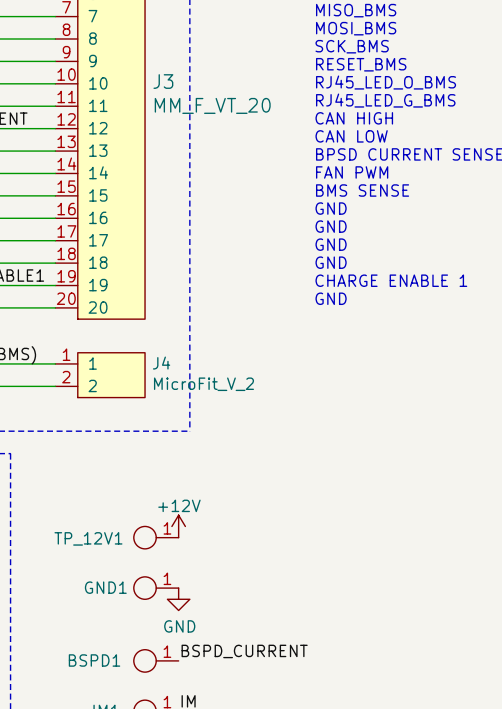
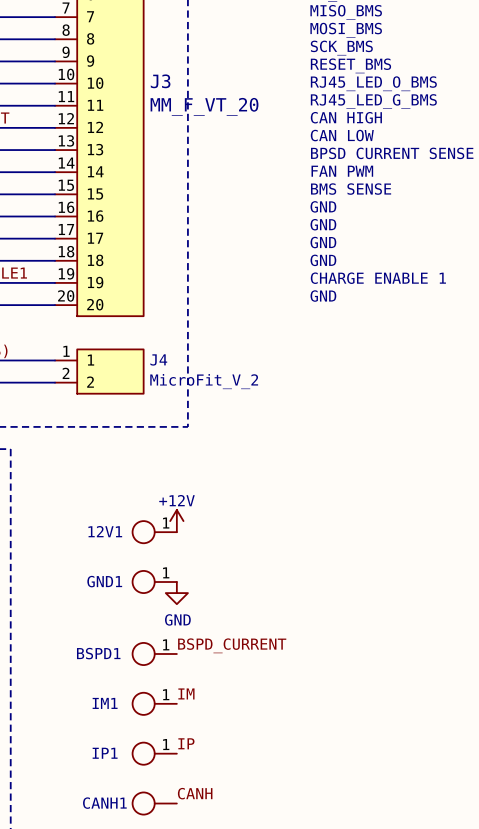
TP_12V1 name: TP_12V1 (88, 538) -> 12V1 (105, 531)

